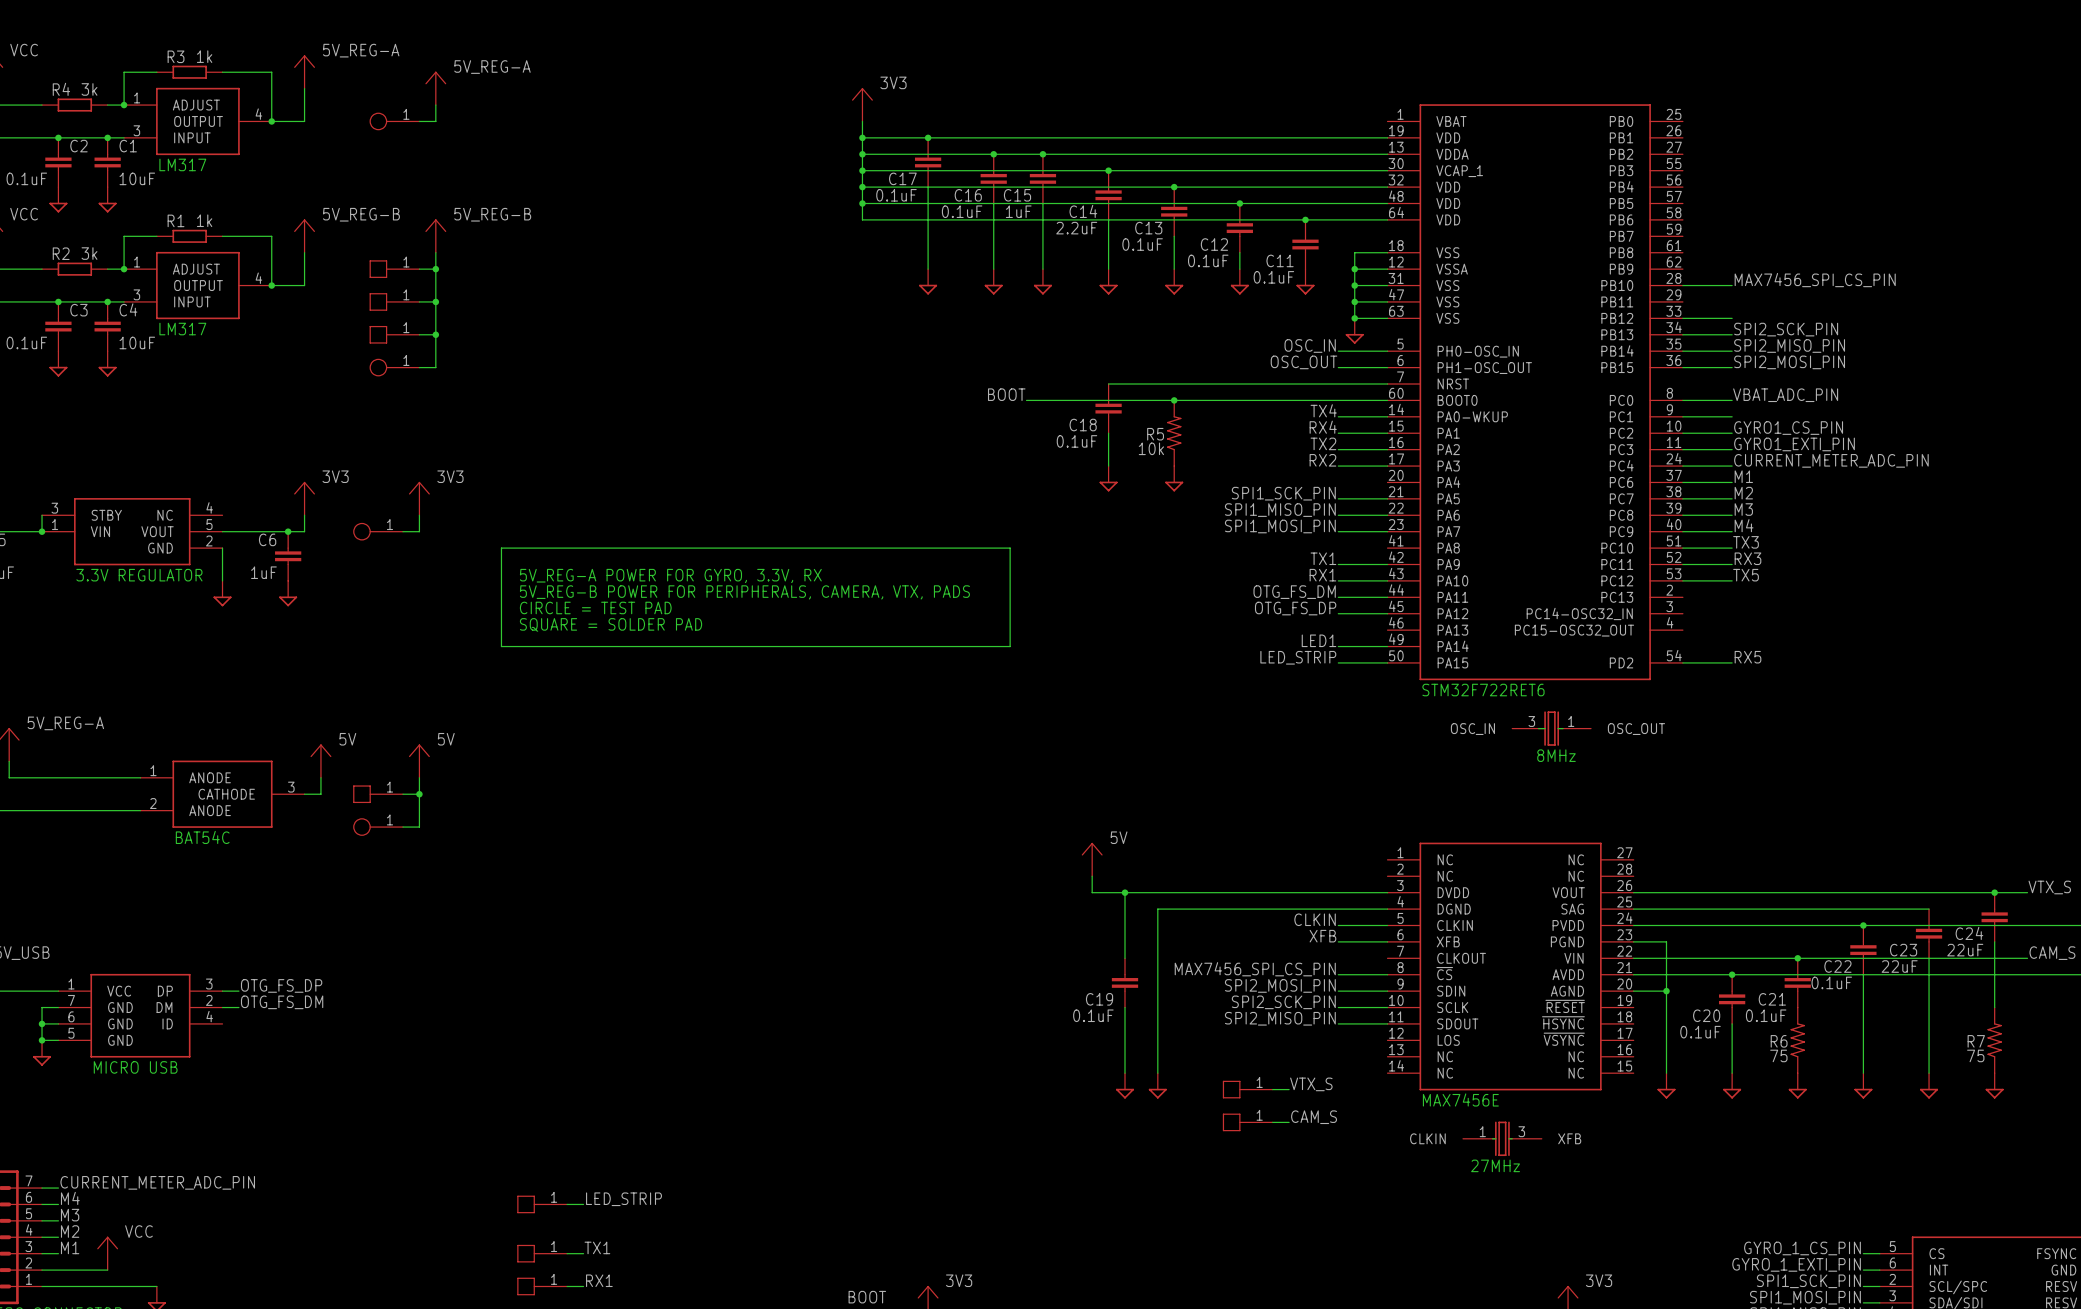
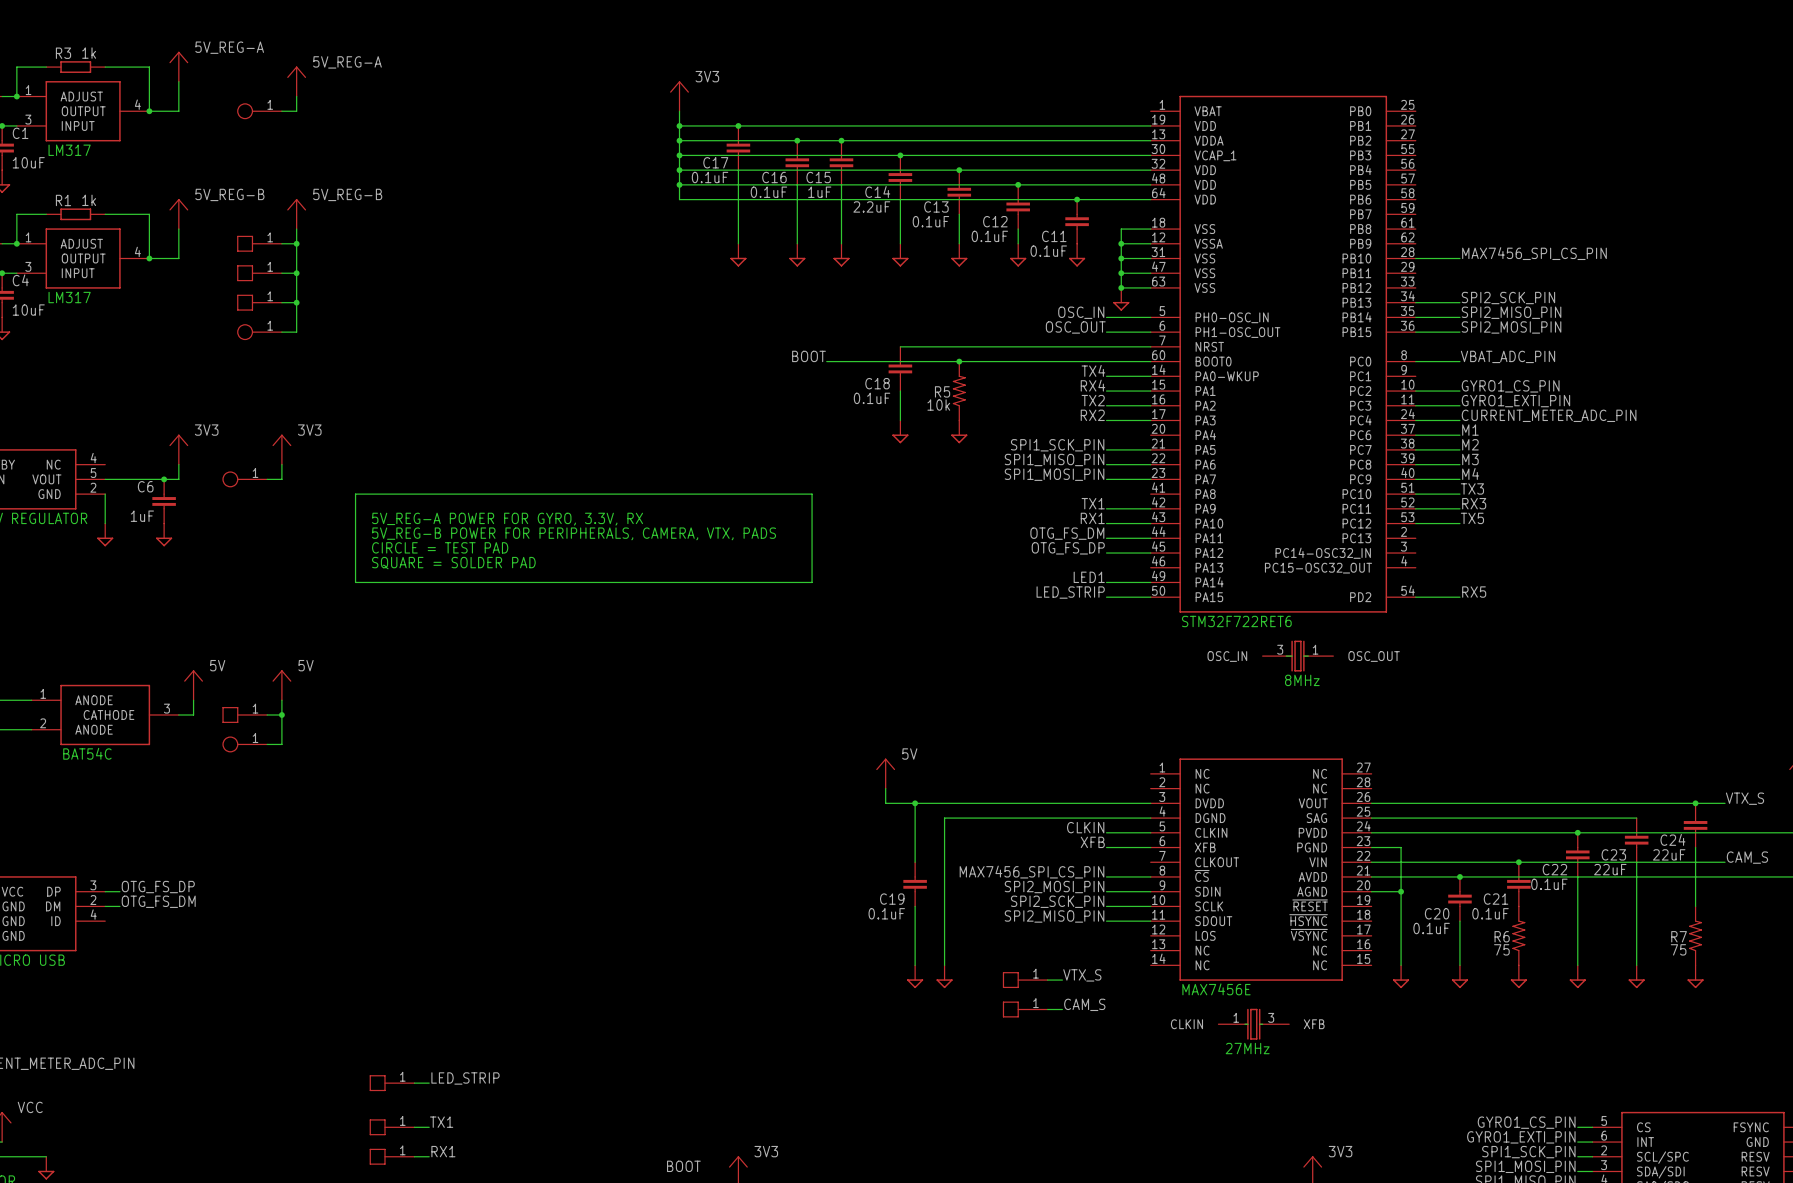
wire: (1682, 318) (1732, 318) -> none
wire: (1682, 416) (1732, 416) -> none
label: GYRO_1_CS_PIN (1802, 1248) -> GYRO1_CS_PIN (1526, 1122)
label: GYRO_1_EXTI_PIN (1796, 1264) -> GYRO1_EXTI_PIN (1521, 1137)

